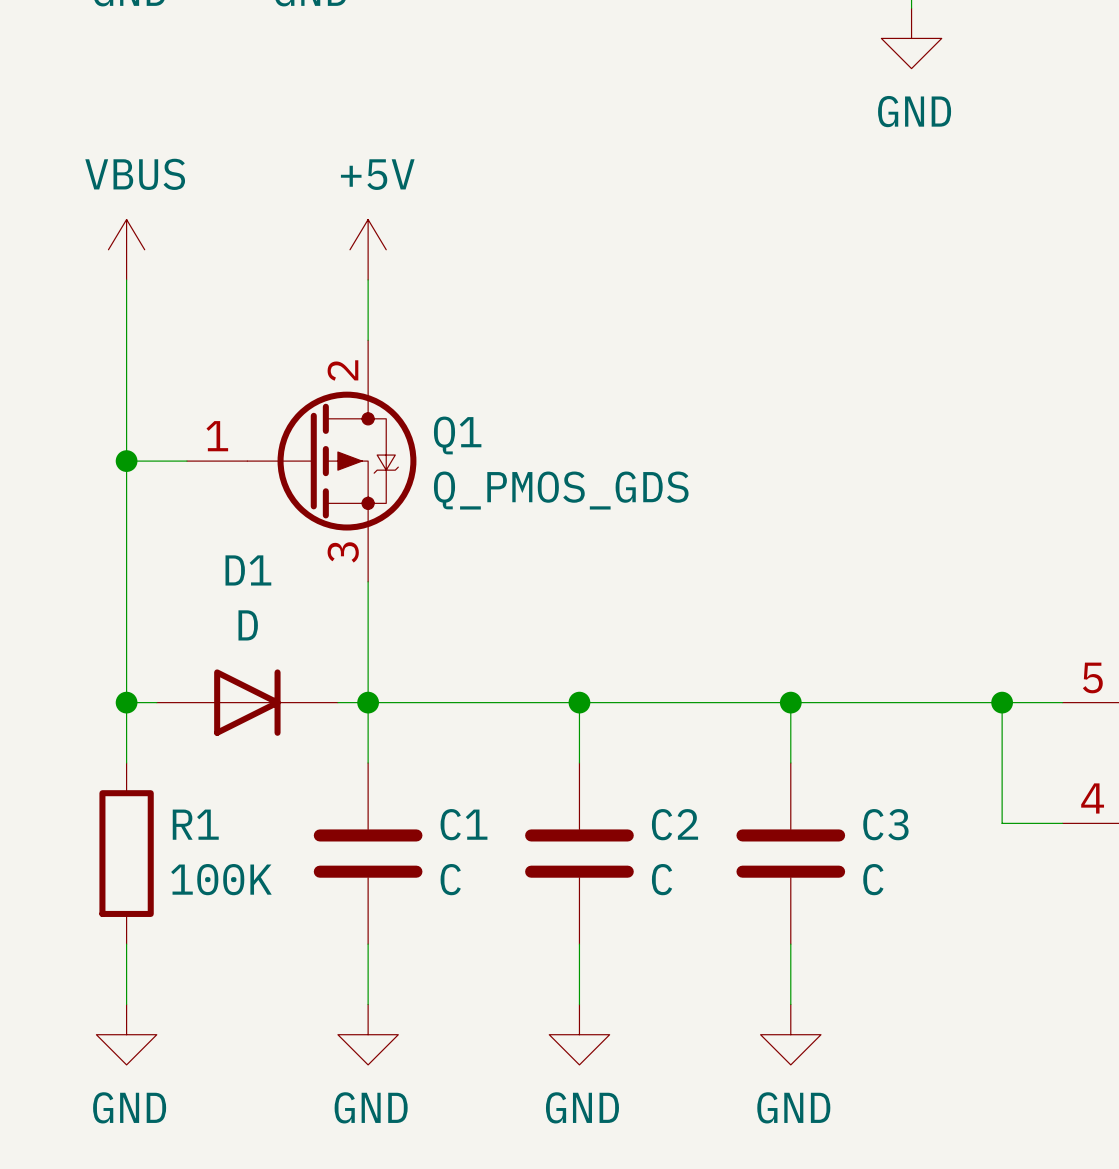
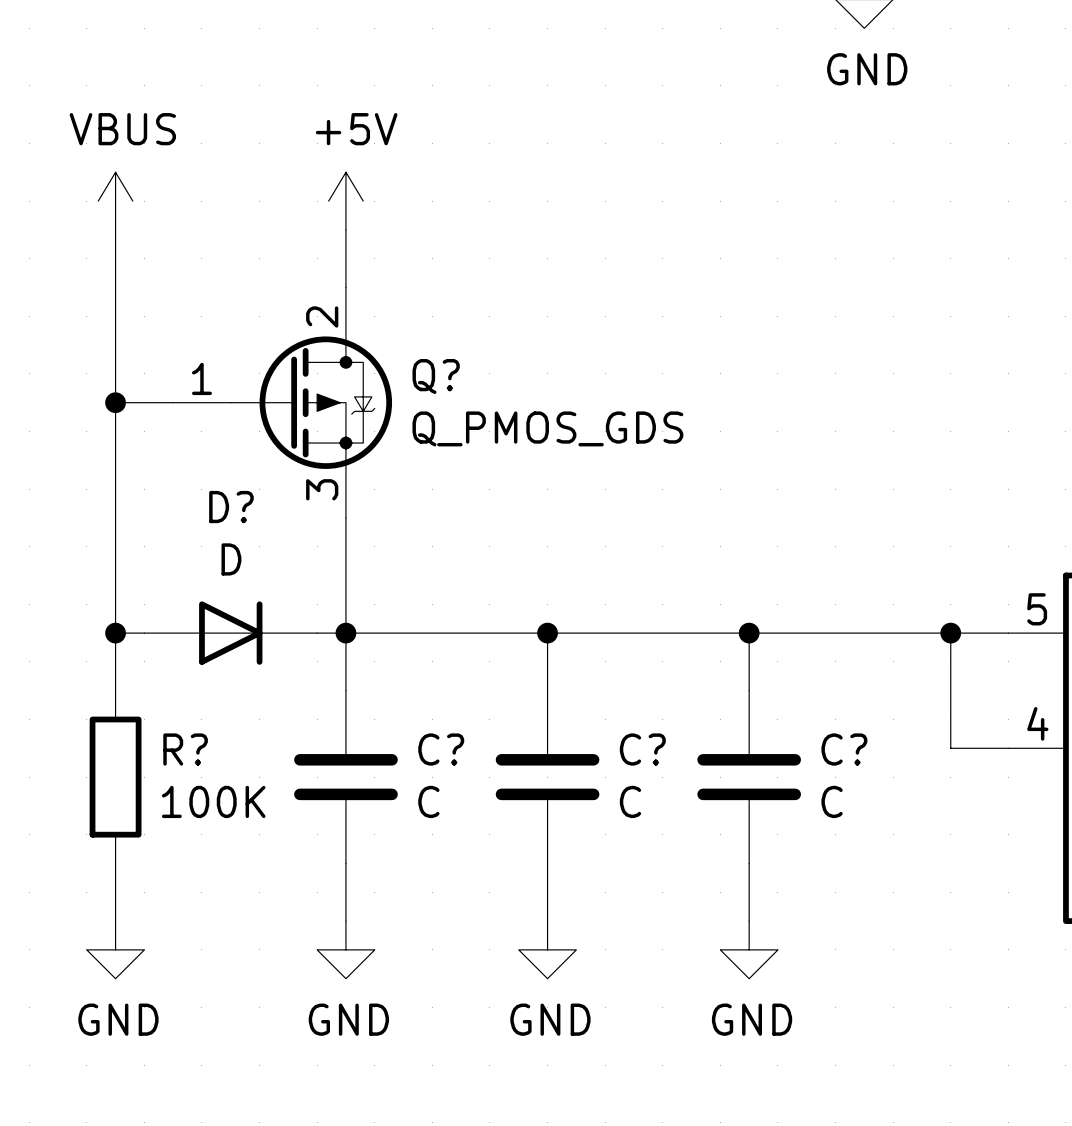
Q1 name: Q1 (457, 435) -> Q? (436, 376)
D1 name: D1 (248, 570) -> D? (231, 507)
R1 name: R1 (195, 824) -> R? (185, 749)
C1 name: C1 (464, 824) -> C? (441, 749)
C2 name: C2 (674, 824) -> C? (642, 749)
C3 name: C3 (885, 824) -> C? (844, 749)

